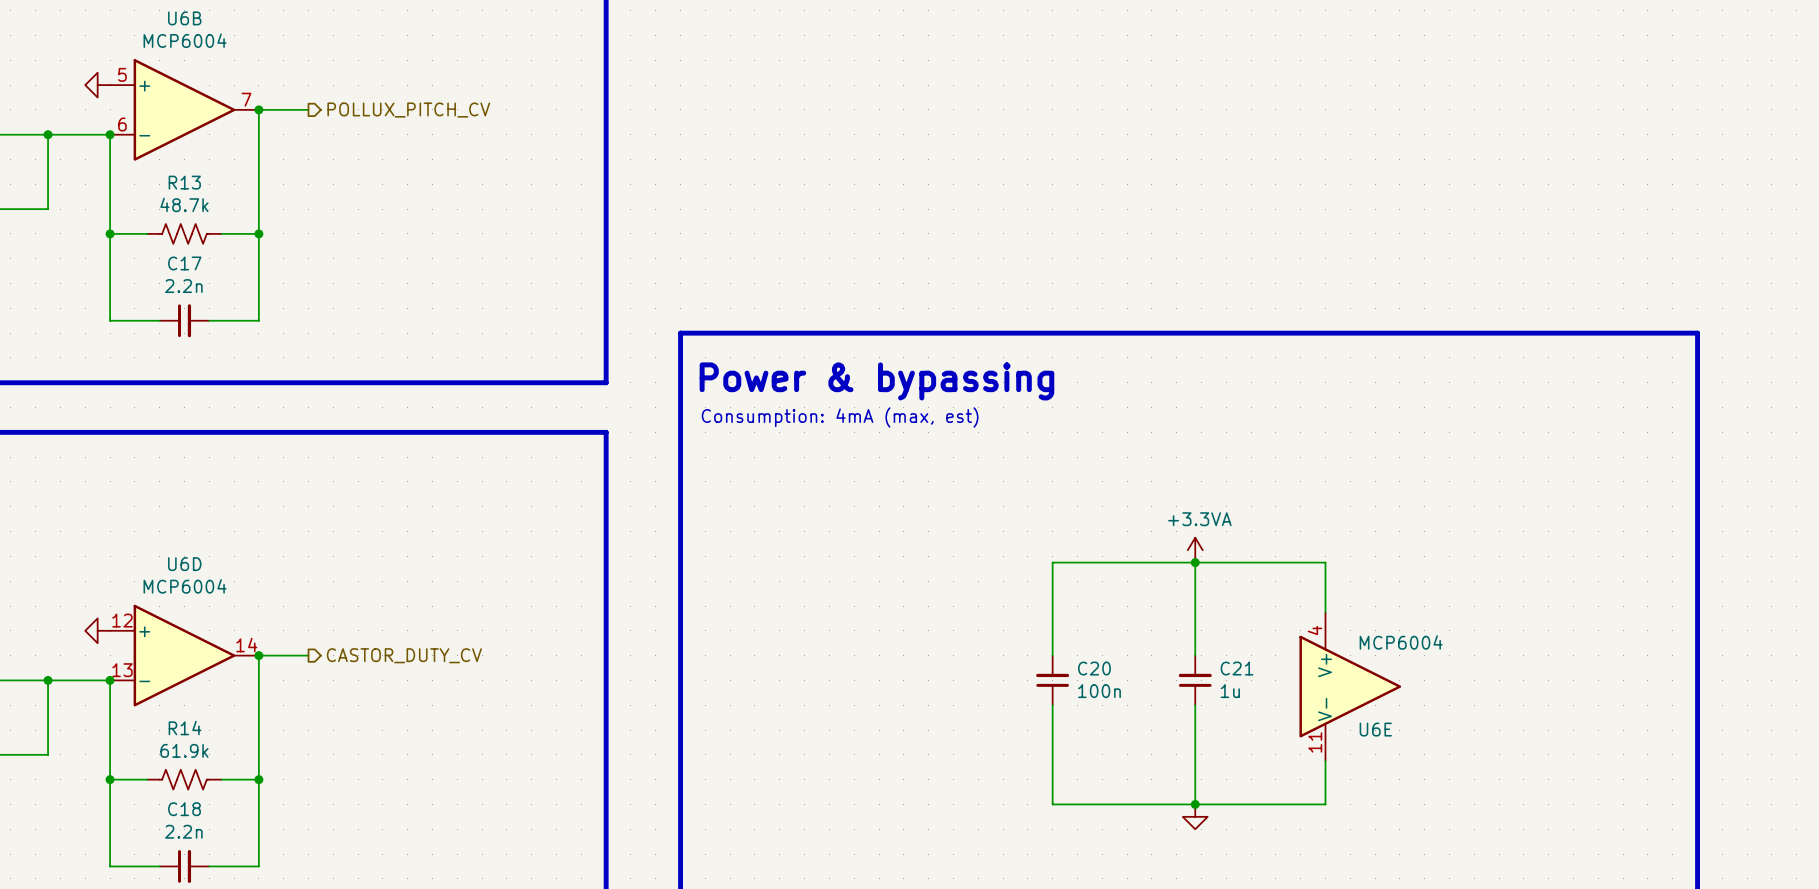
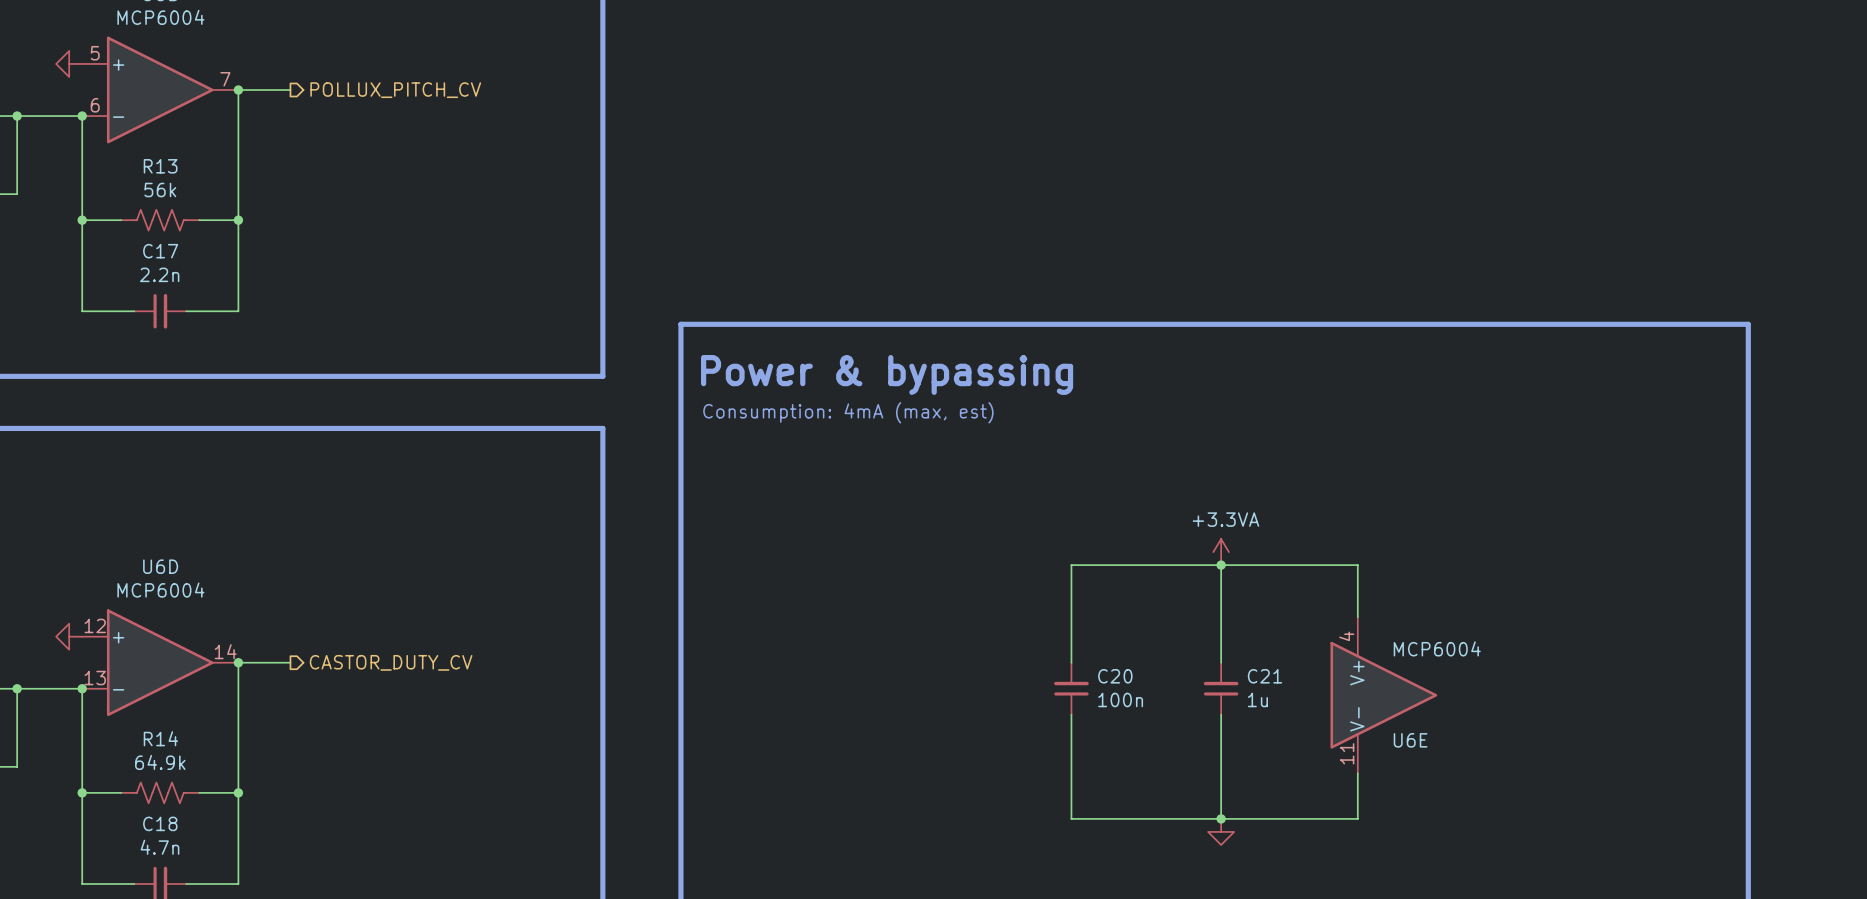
R13 value: 48.7k (184, 204) -> 56k (160, 190)
R14 value: 61.9k (184, 750) -> 64.9k (160, 762)
C18 value: 2.2n (183, 831) -> 4.7n (159, 847)

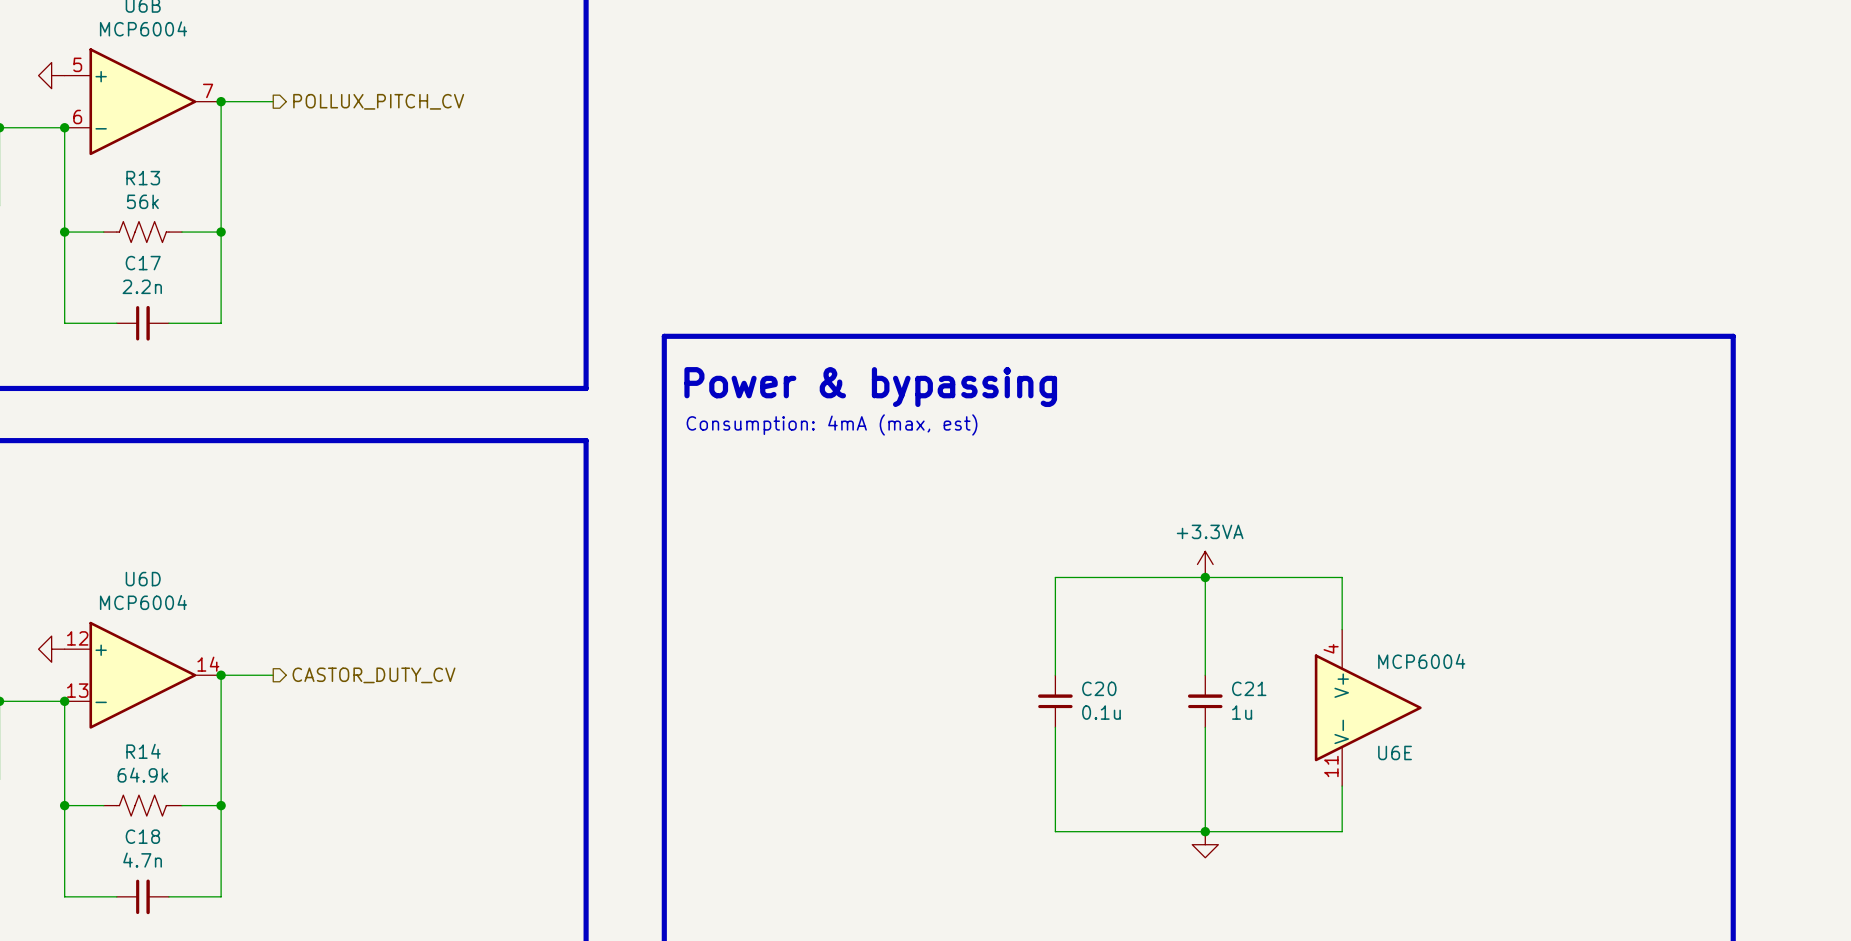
C20 value: 100n (1120, 699) -> 0.1u (1101, 712)

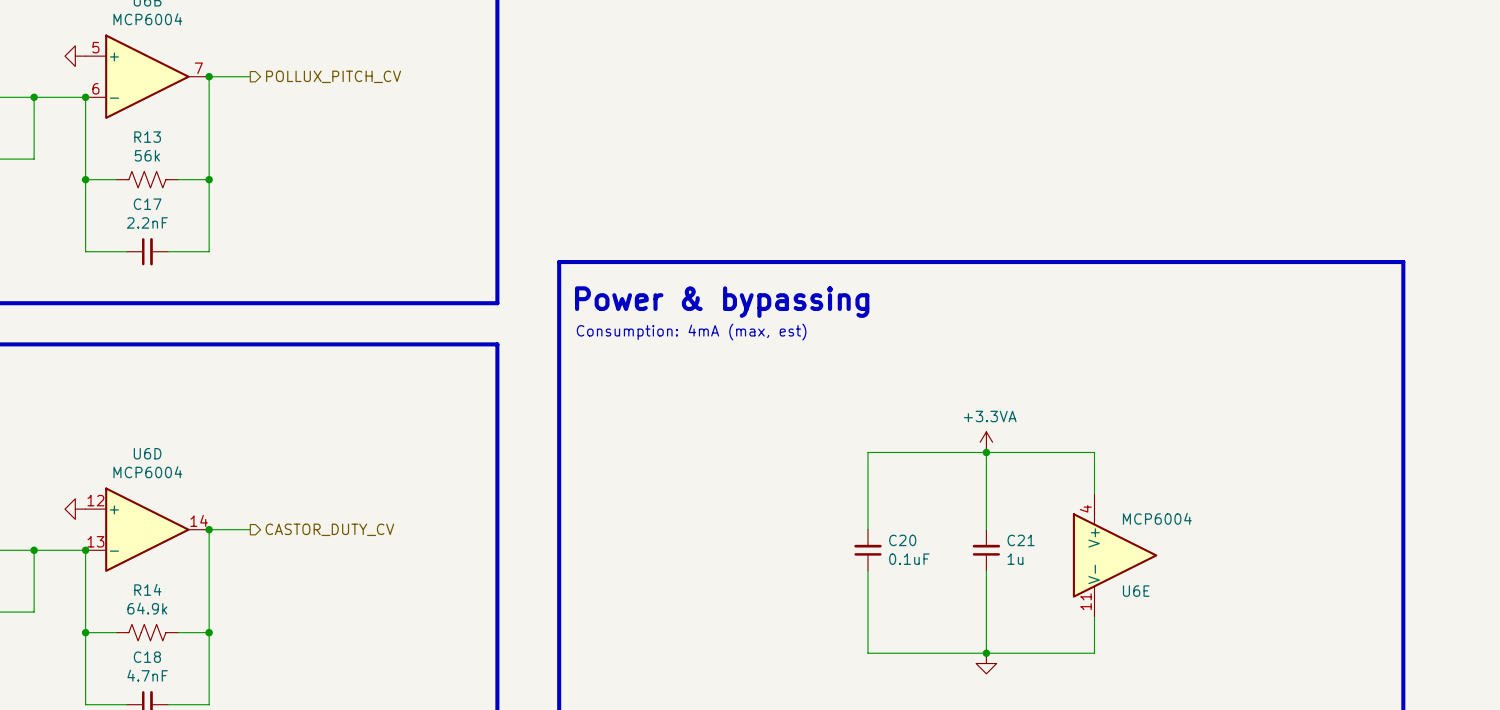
C17 value: 2.2n (142, 286) -> 2.2nF (147, 222)
C20 value: 0.1u (1101, 712) -> 0.1uF (909, 559)
C18 value: 4.7n (142, 860) -> 4.7nF (147, 675)

